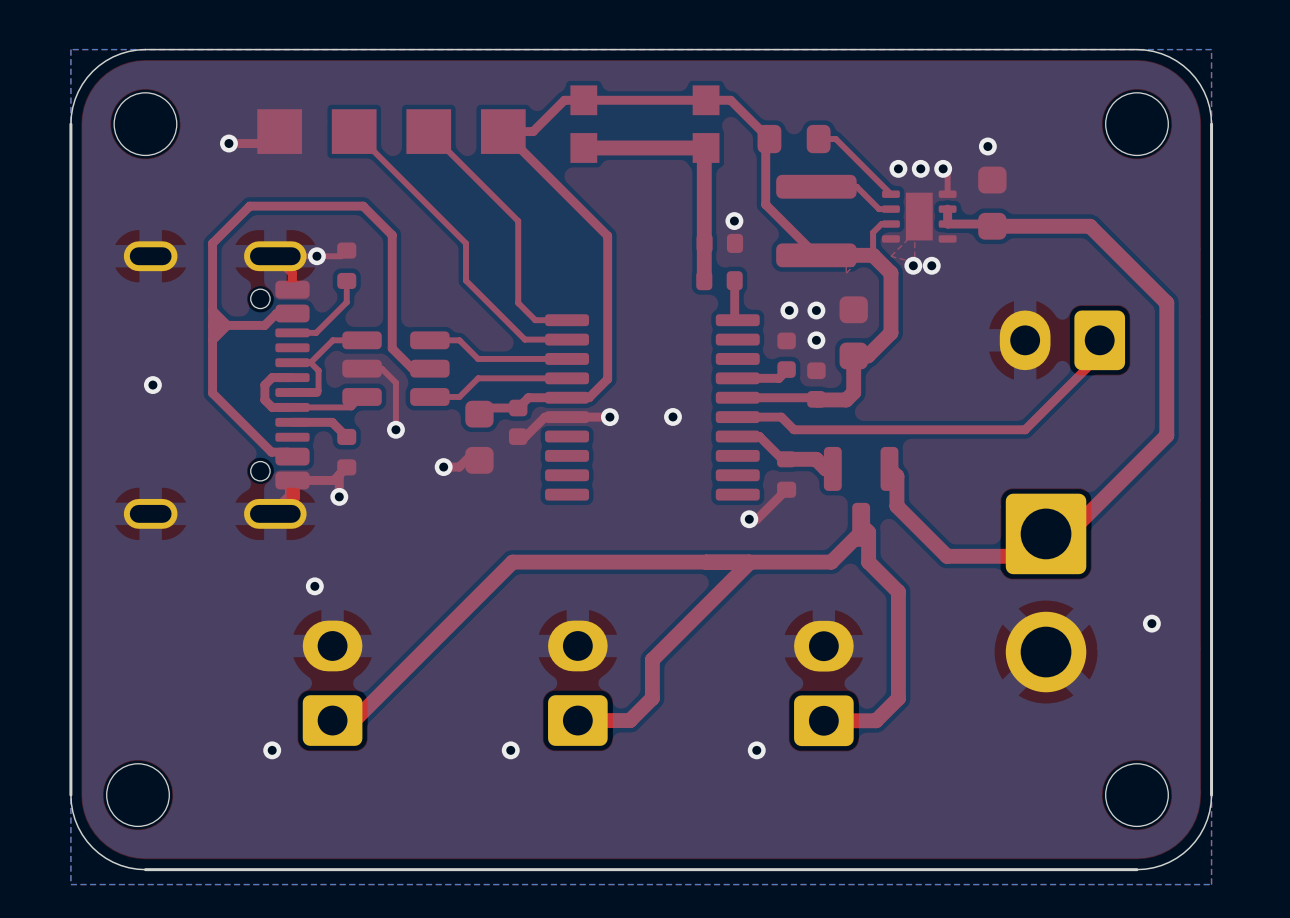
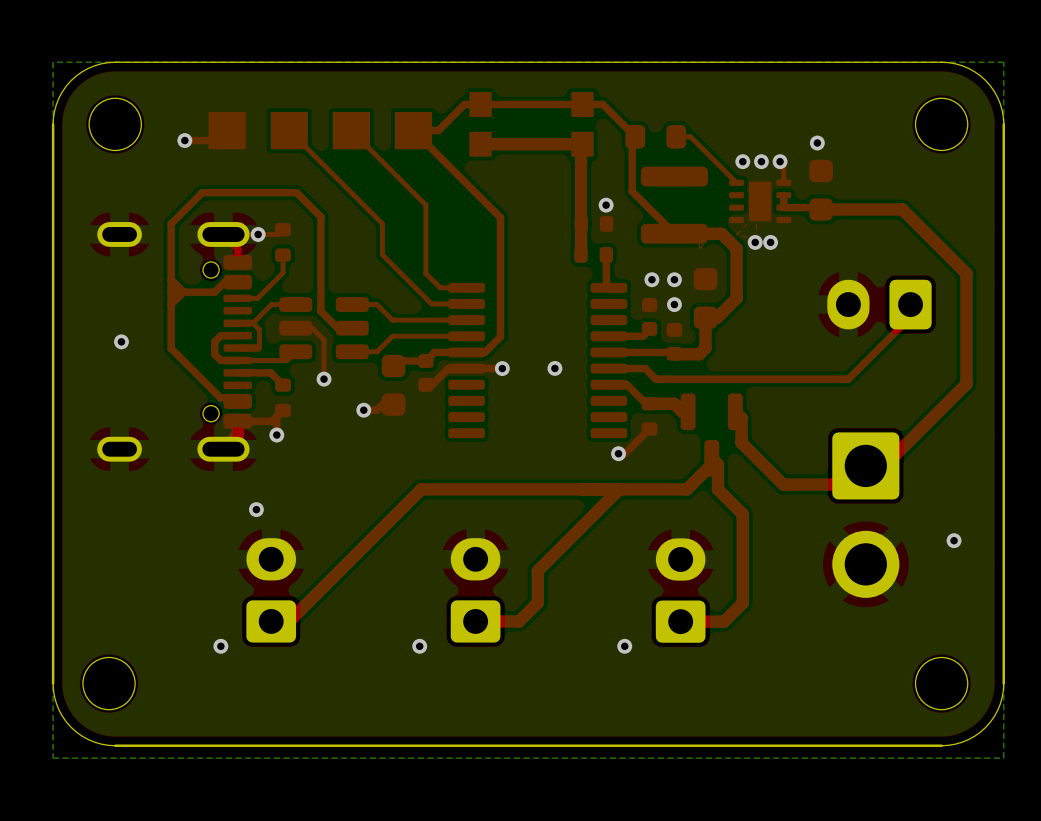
top track: (816, 186) (856, 186) (879, 209) (890, 209) -> none
top track: (890, 224) (881, 224) (873, 232) (873, 255) -> none

